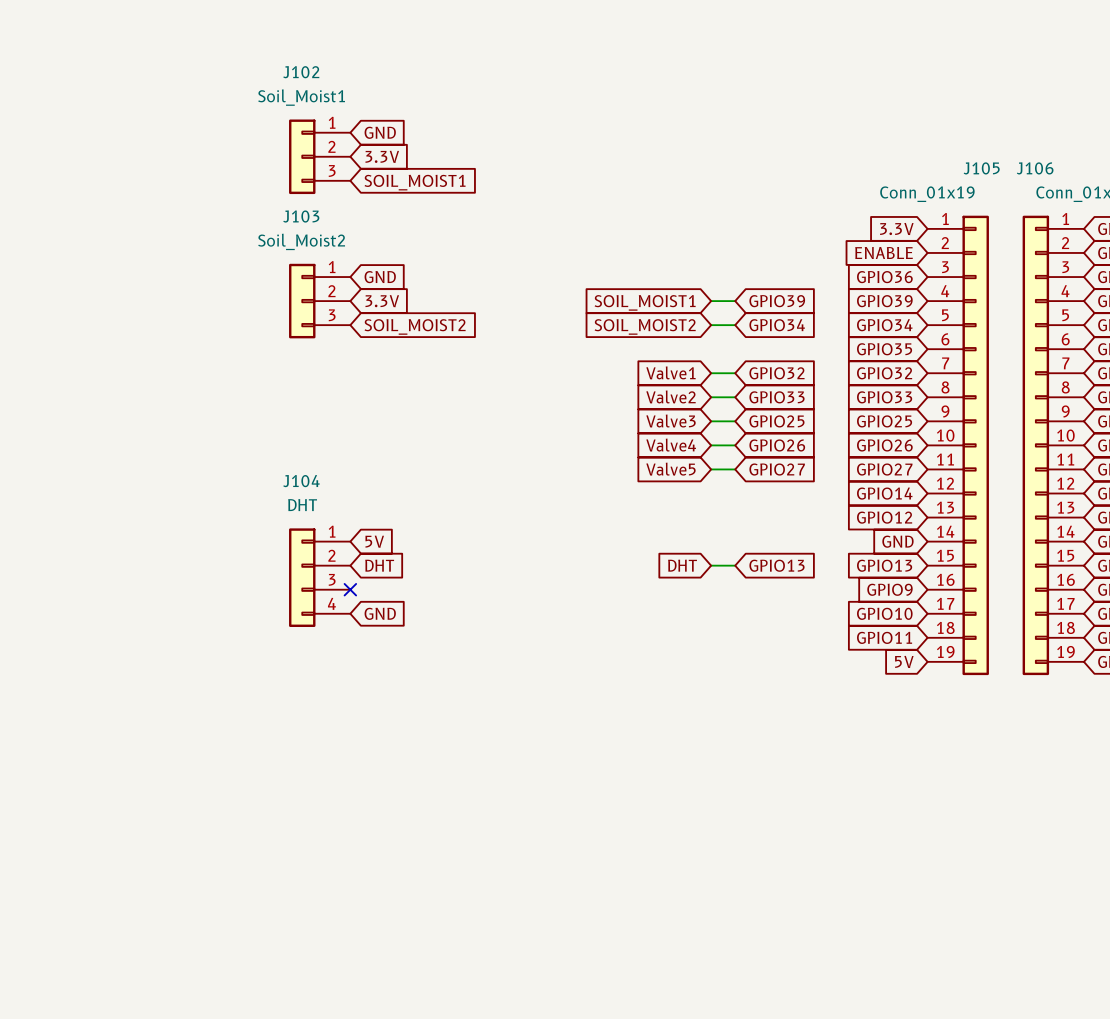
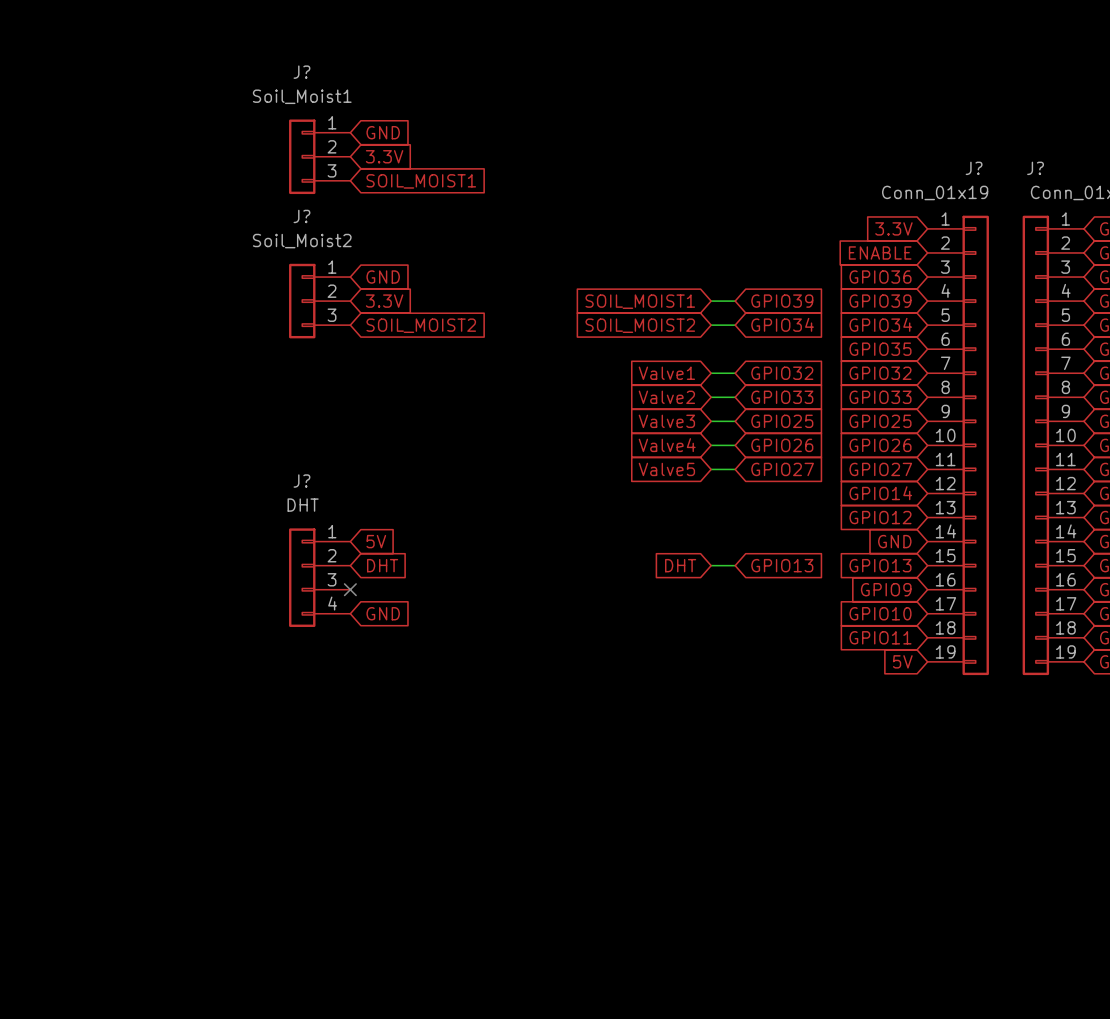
J102 name: J102 (301, 72) -> J? (301, 72)
J105 name: J105 (981, 168) -> J? (974, 168)
J106 name: J106 (1035, 168) -> J? (1035, 168)
J103 name: J103 (301, 216) -> J? (301, 216)
J104 name: J104 (301, 481) -> J? (301, 481)

